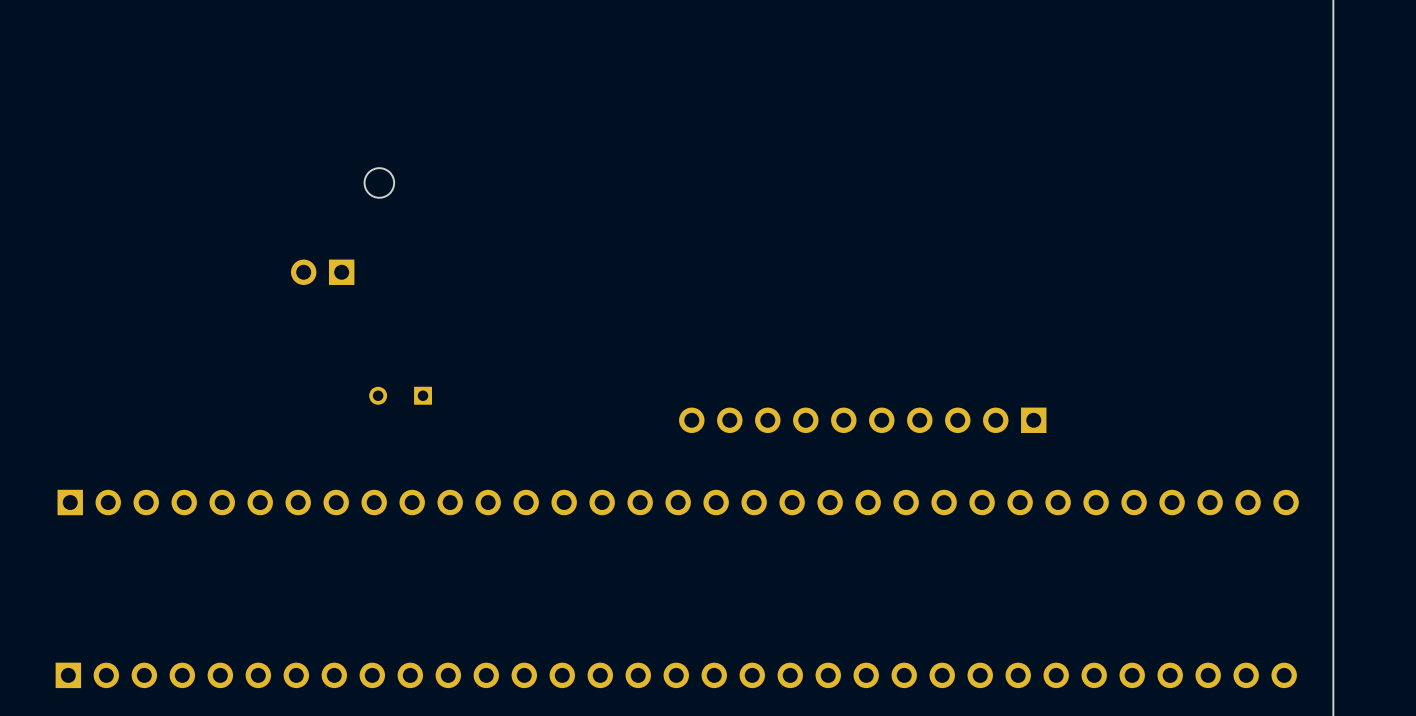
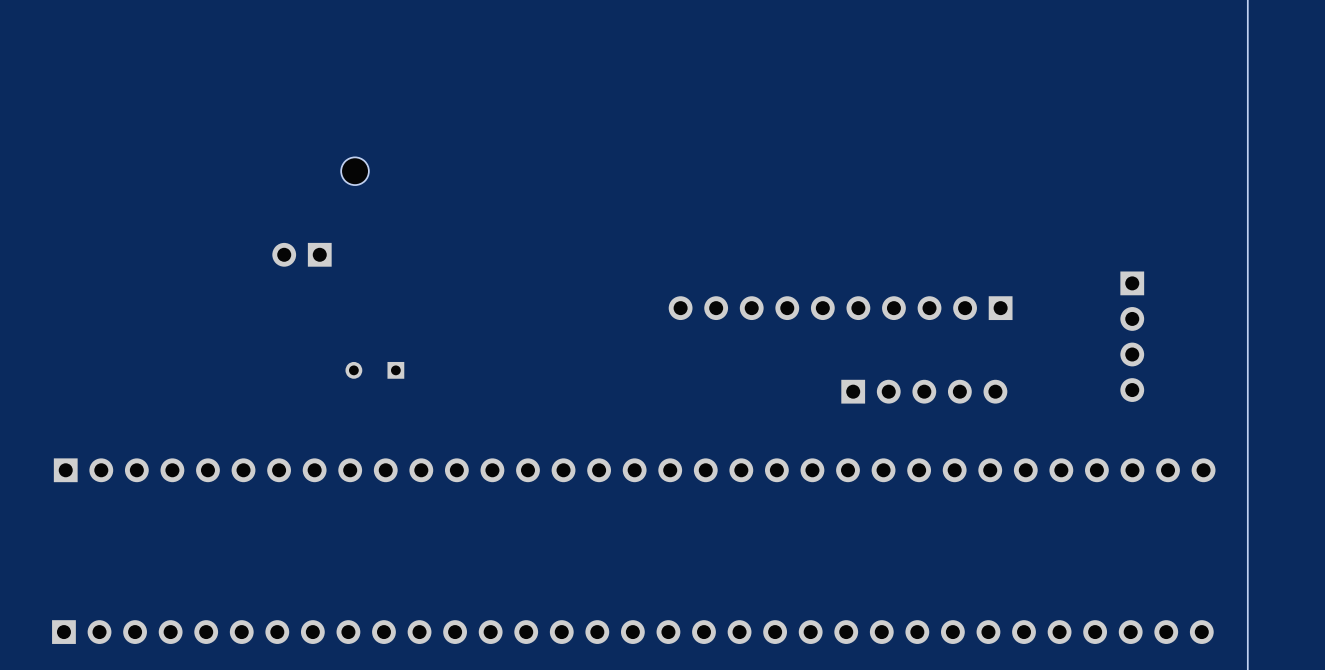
part: none -> (1132, 336)
part: none -> (924, 391)
part position: (862, 420) -> (840, 308)

